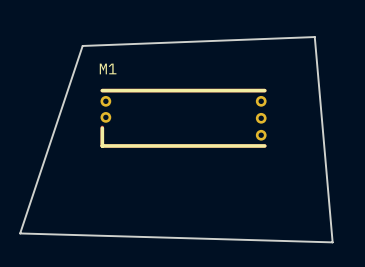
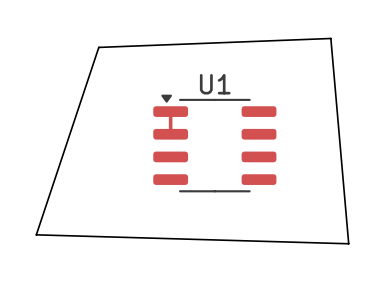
track: none -> (170, 111) (170, 134)
M1: (183, 118) -> none
U1: none -> (214, 143)

